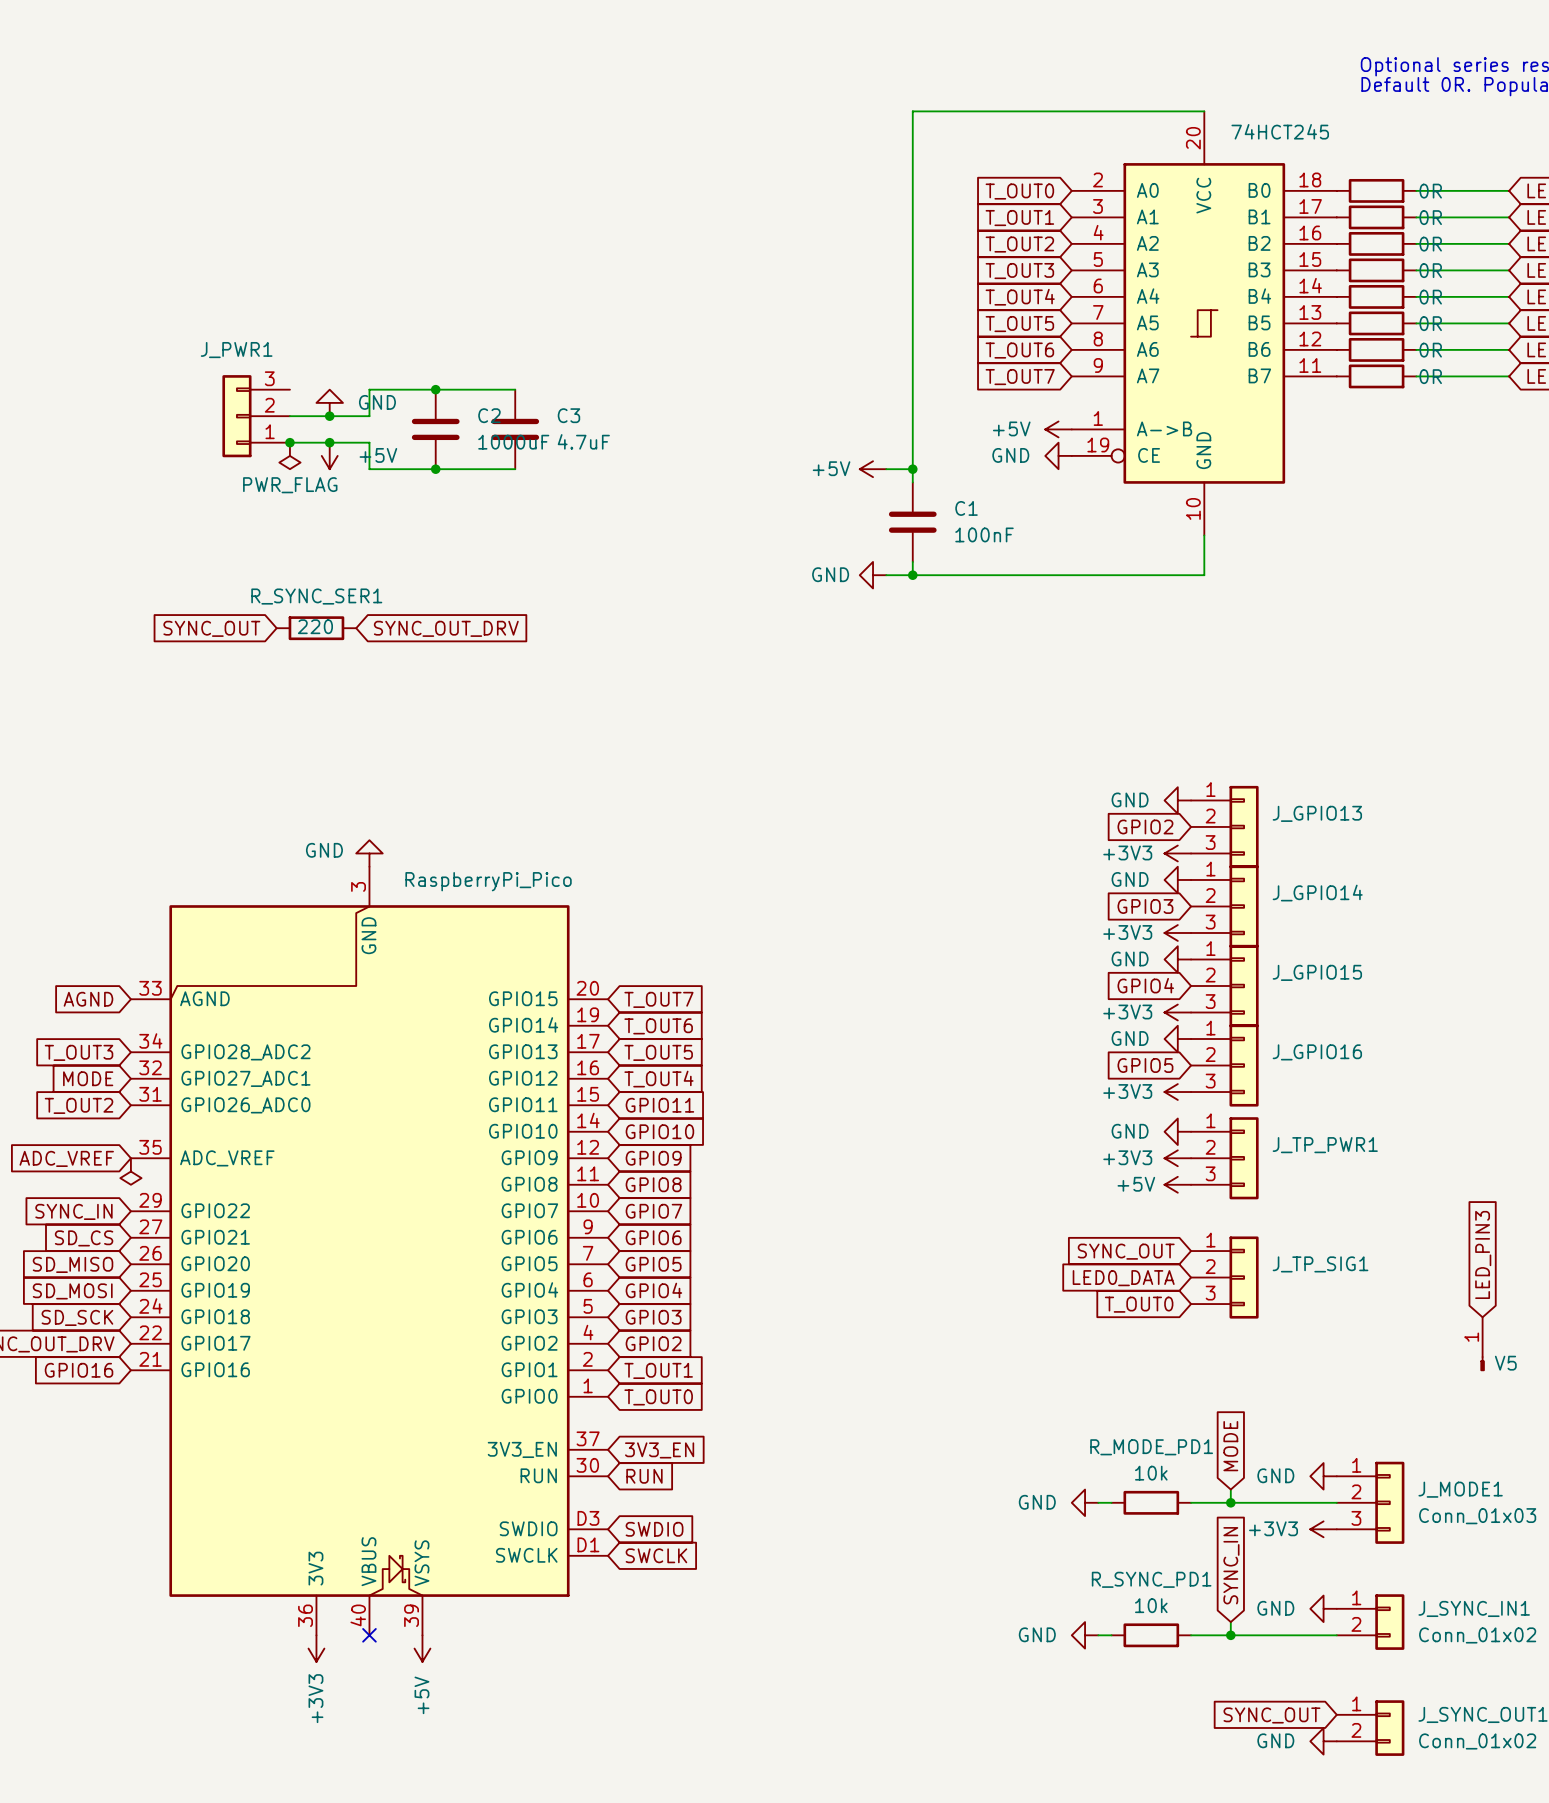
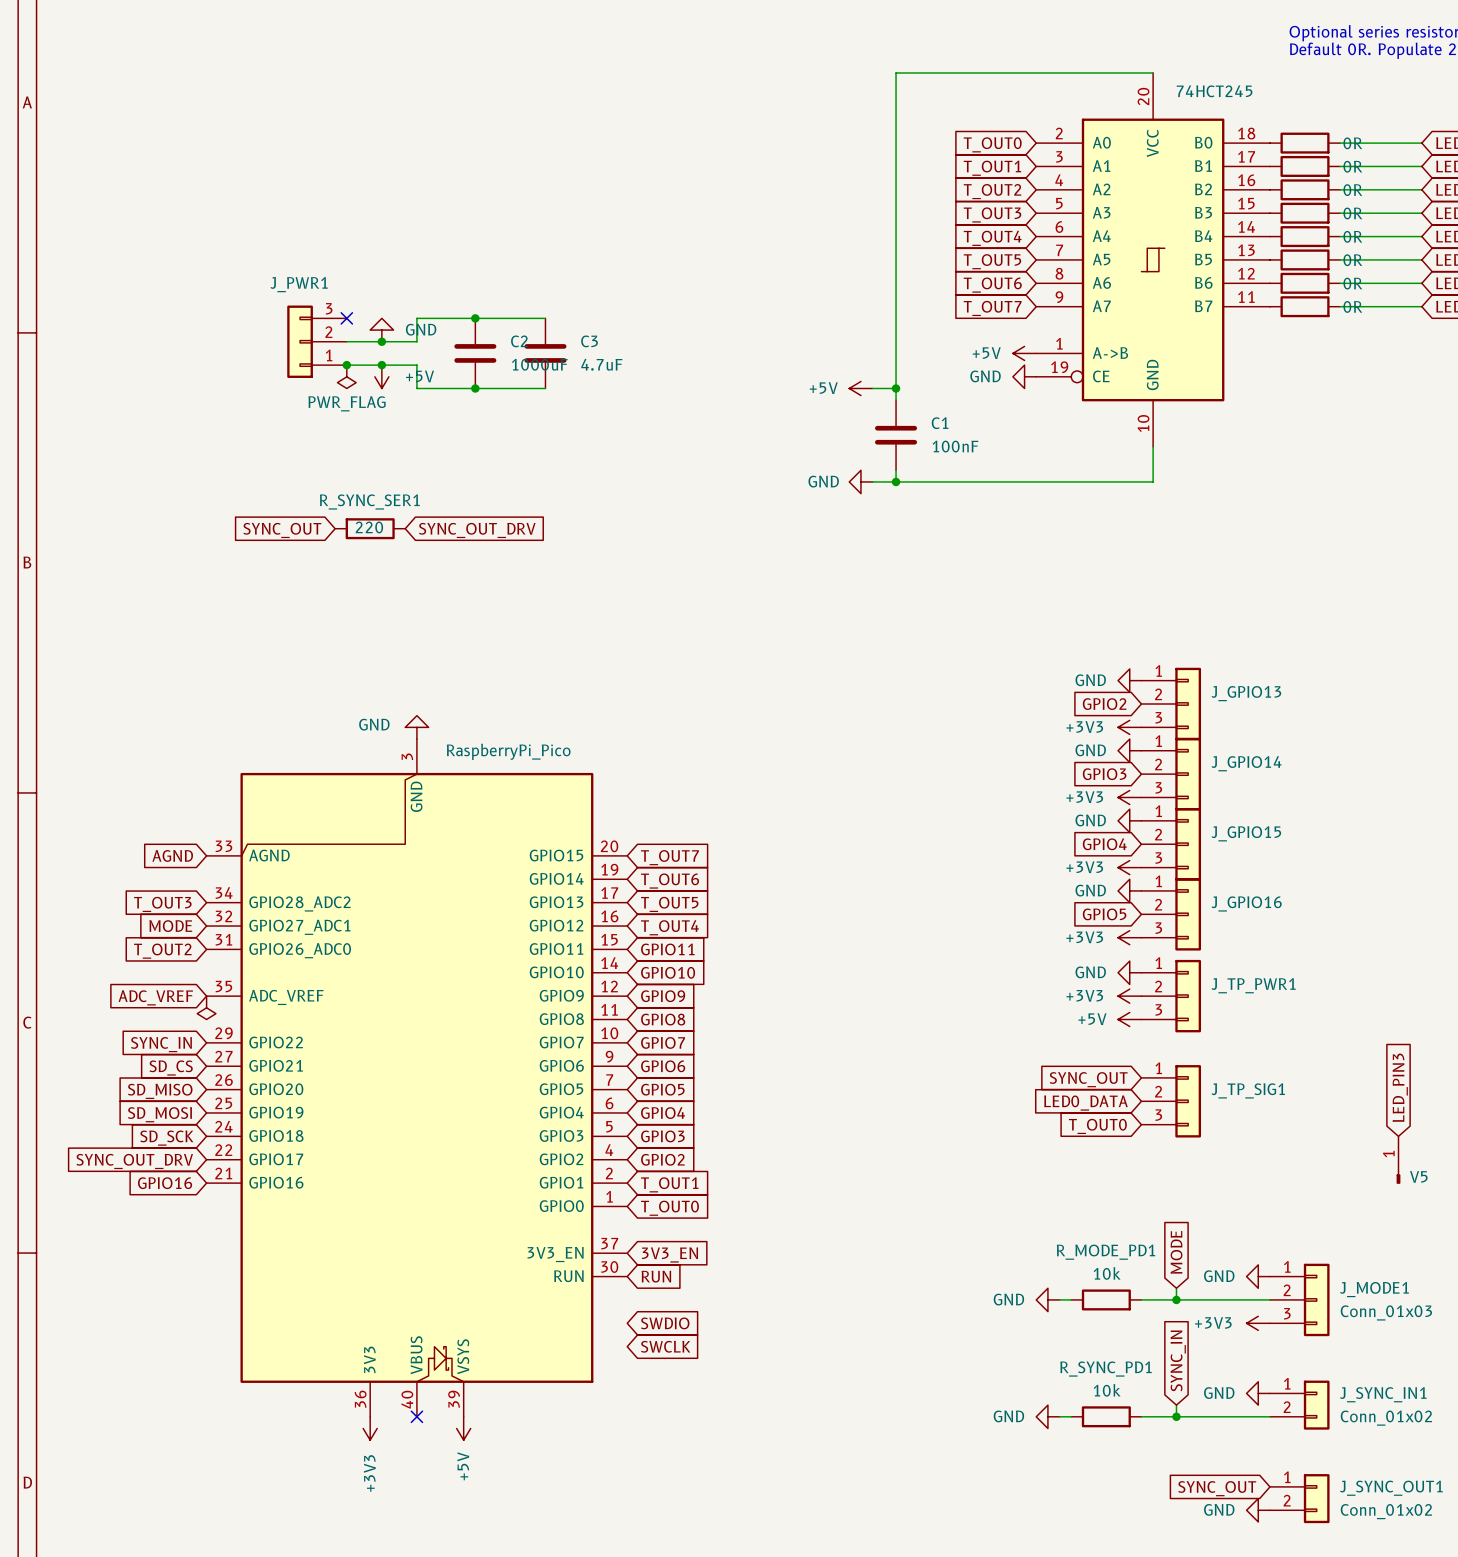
no-connect mark: none -> (346, 318)
part symbol: [130, 866, 608, 1636] -> [206, 739, 628, 1417]

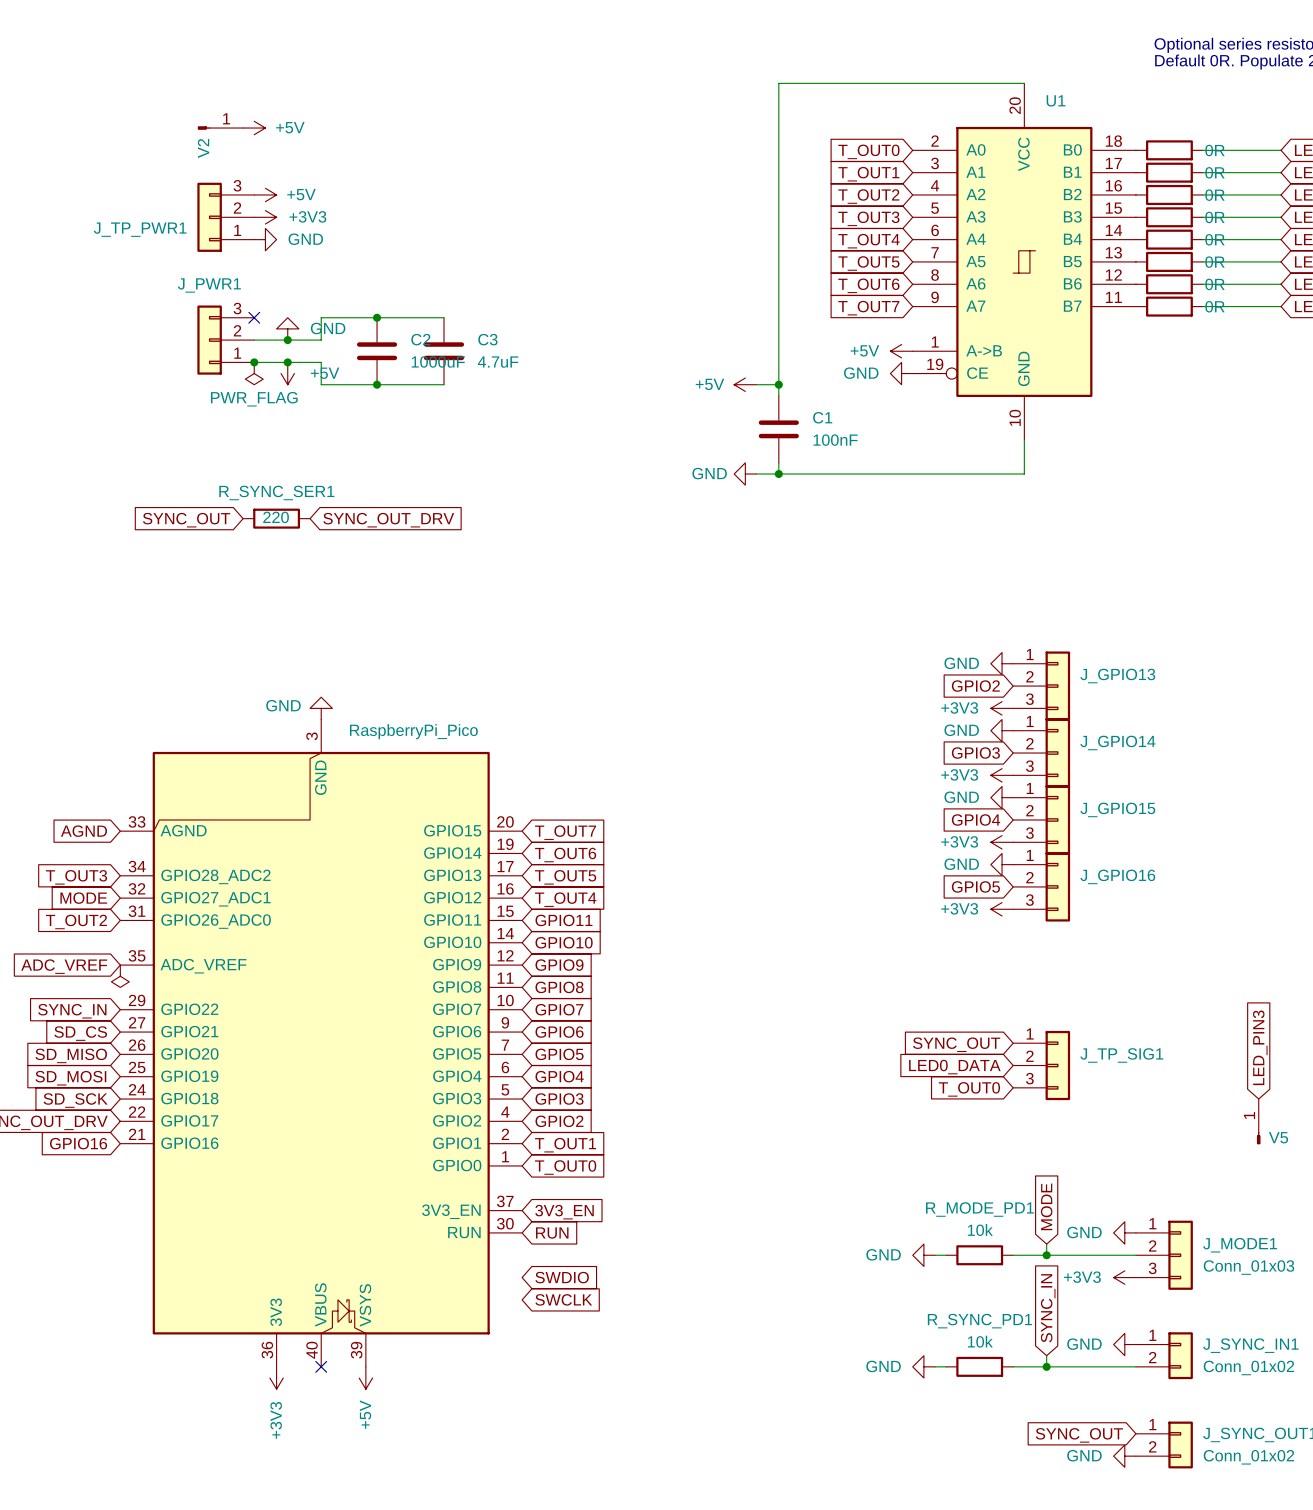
74HCT245 name: 74HCT245 (1214, 91) -> U1 (1056, 100)
V2: none -> (220, 128)
power symbol: none -> +5V (254, 128)
power symbol: none -> +5V (265, 194)
power symbol: none -> +3V3 (265, 217)
power symbol: none -> GND (265, 239)
power symbol: GND (1129, 972) -> none
power symbol: +3V3 (1129, 996) -> none
J_TP_PWR1 position: (1171, 996) -> (225, 217)
J_TP_PWR1 rotation: 0° (1188, 996) -> 180° (209, 217)
power symbol: +5V (1129, 1019) -> none

